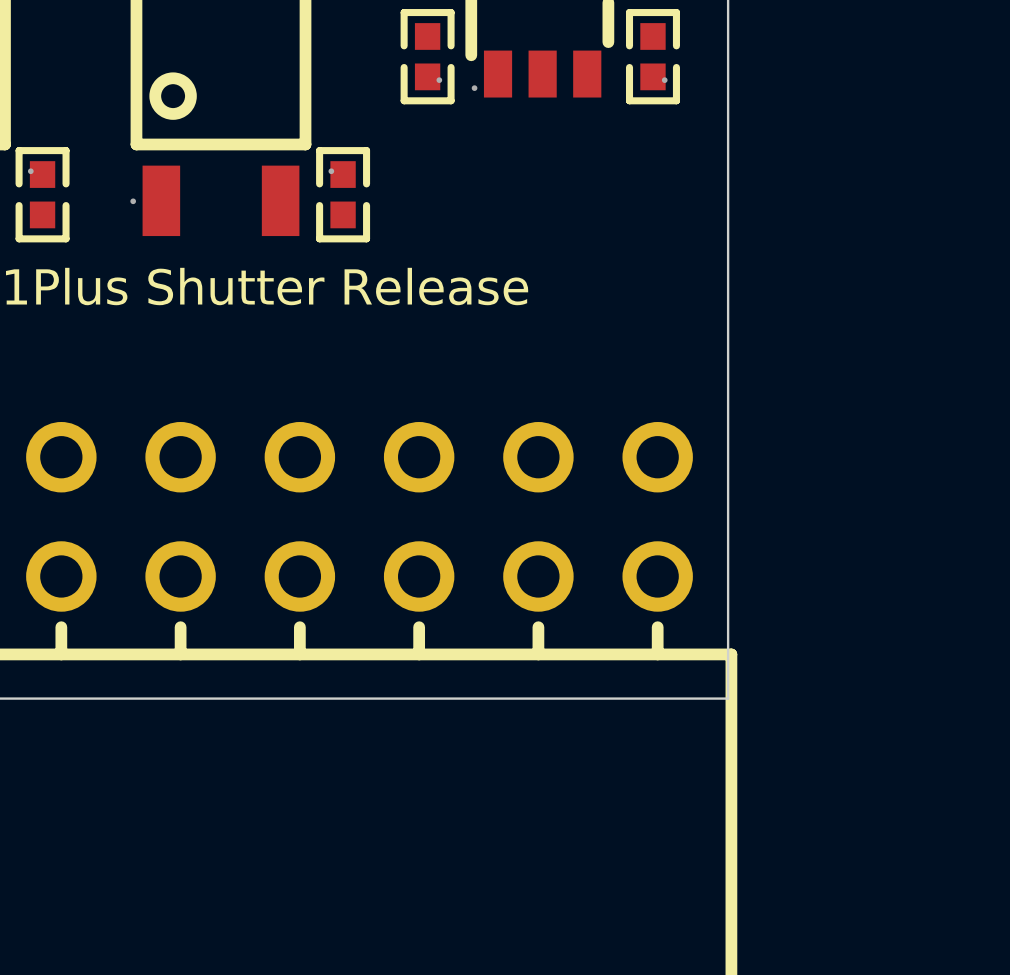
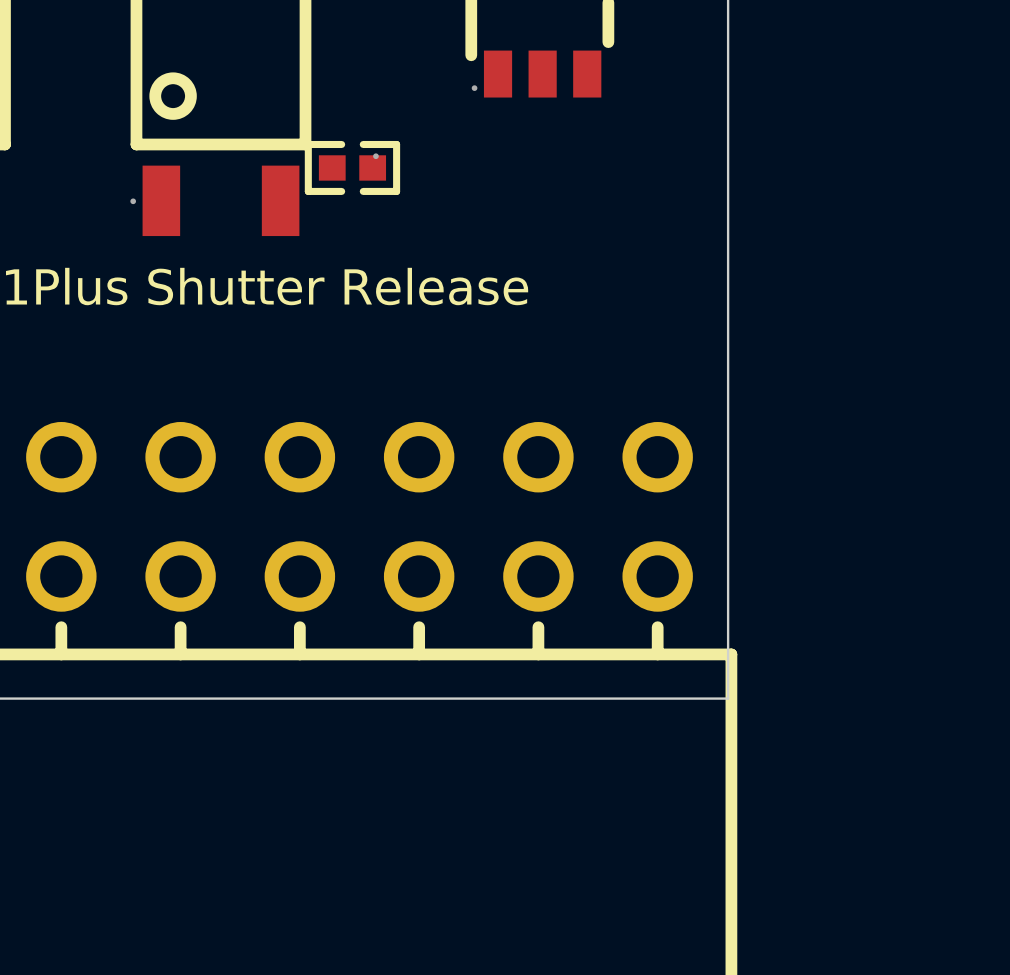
part: (427, 56) -> none
part: (652, 56) -> none
part: (42, 194) -> none
part rotation: 0° (343, 194) -> 90° clockwise (352, 167)

